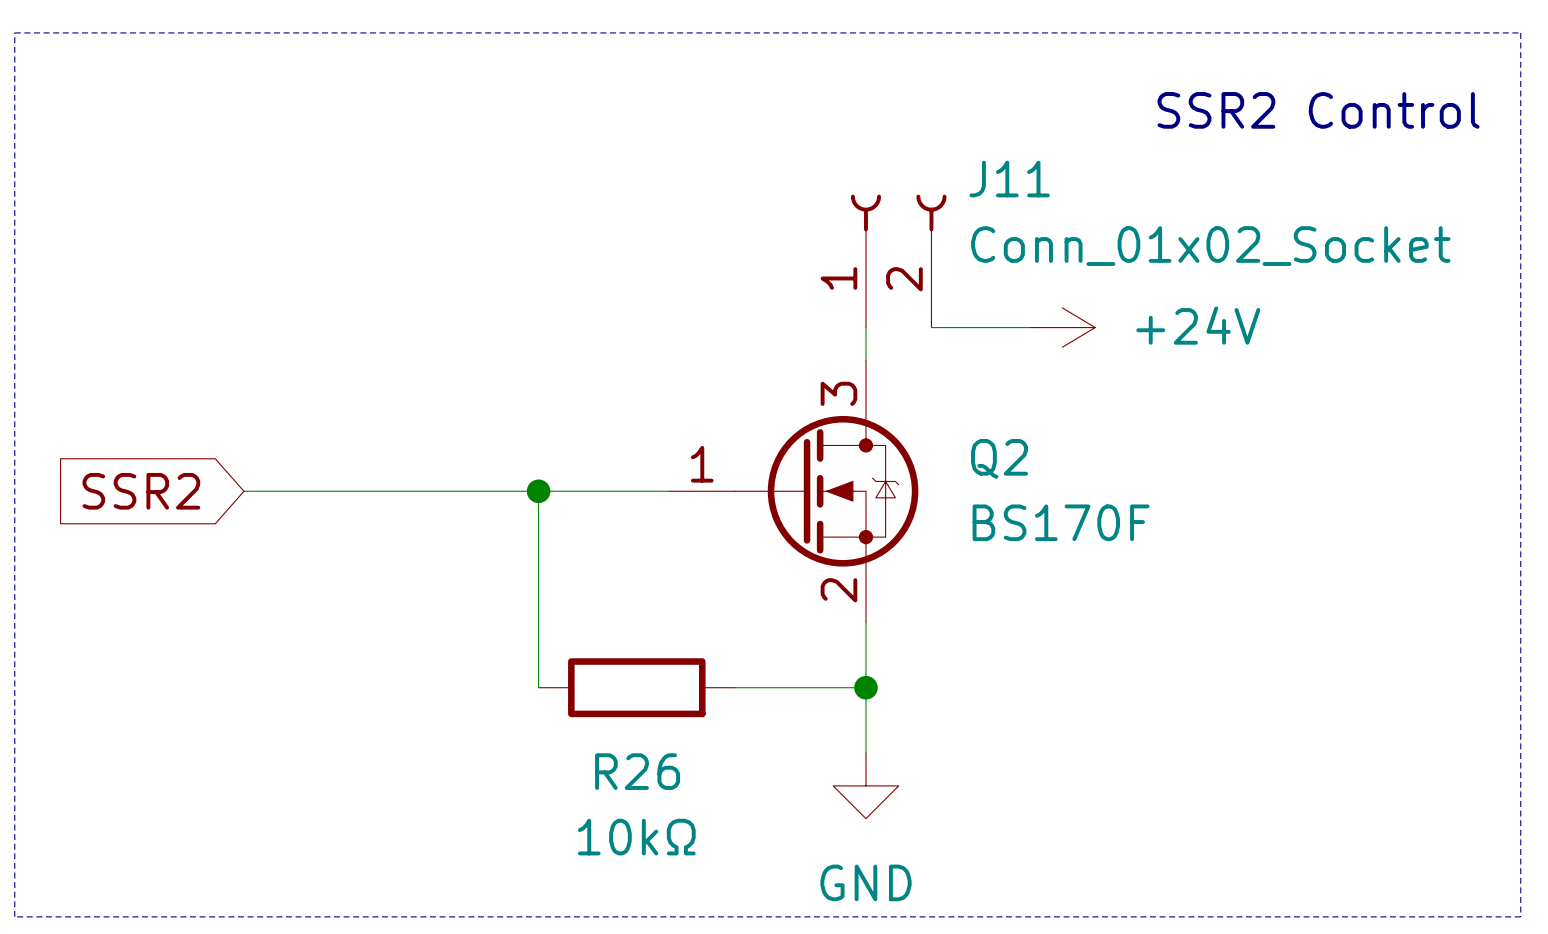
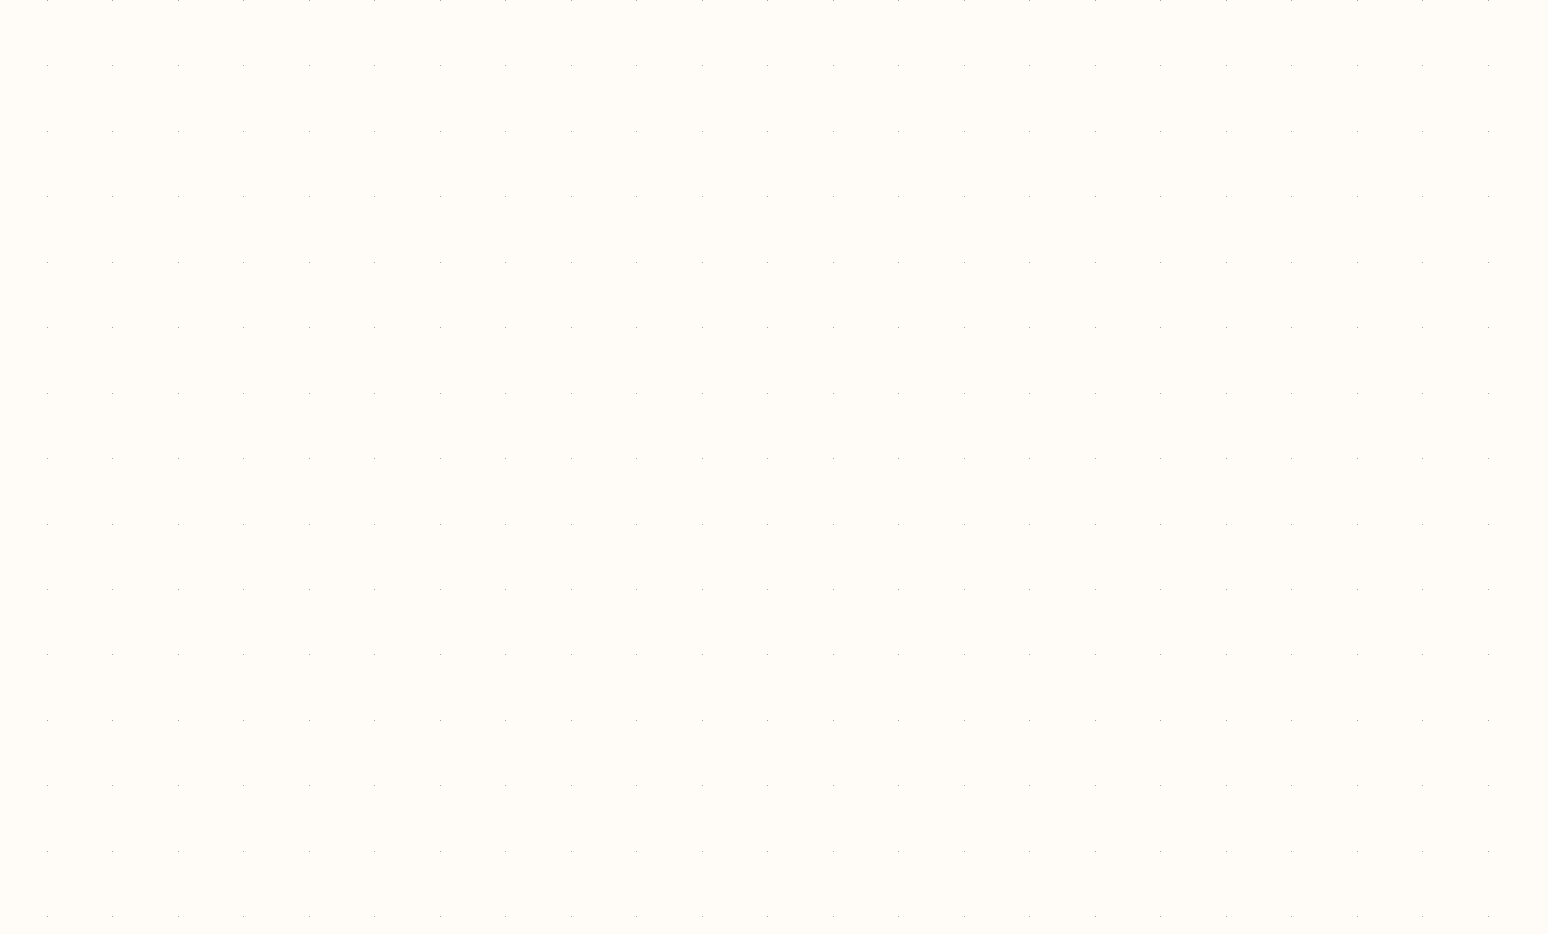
line: (14, 32) (1520, 32) (1520, 916) (14, 916) (14, 32) -> none
text: SSR2 Control (1318, 110) -> none
J11: Conn_01x02_Socket (898, 261) -> none
wire: (865, 327) (865, 360) -> none
wire: (931, 327) (1029, 327) -> none
power symbol: +24V (1062, 327) -> none
global label: SSR2 (141, 491) -> none
wire: (243, 491) (669, 491) -> none
wire: (538, 491) (538, 687) -> none
junction: (538, 491) -> none
Q2: BS170F (793, 491) -> none
wire: (865, 622) (865, 753) -> none
R26: 10kΩ (636, 687) -> none
wire: (735, 687) (865, 687) -> none
junction: (865, 687) -> none
power symbol: GND (865, 785) -> none

